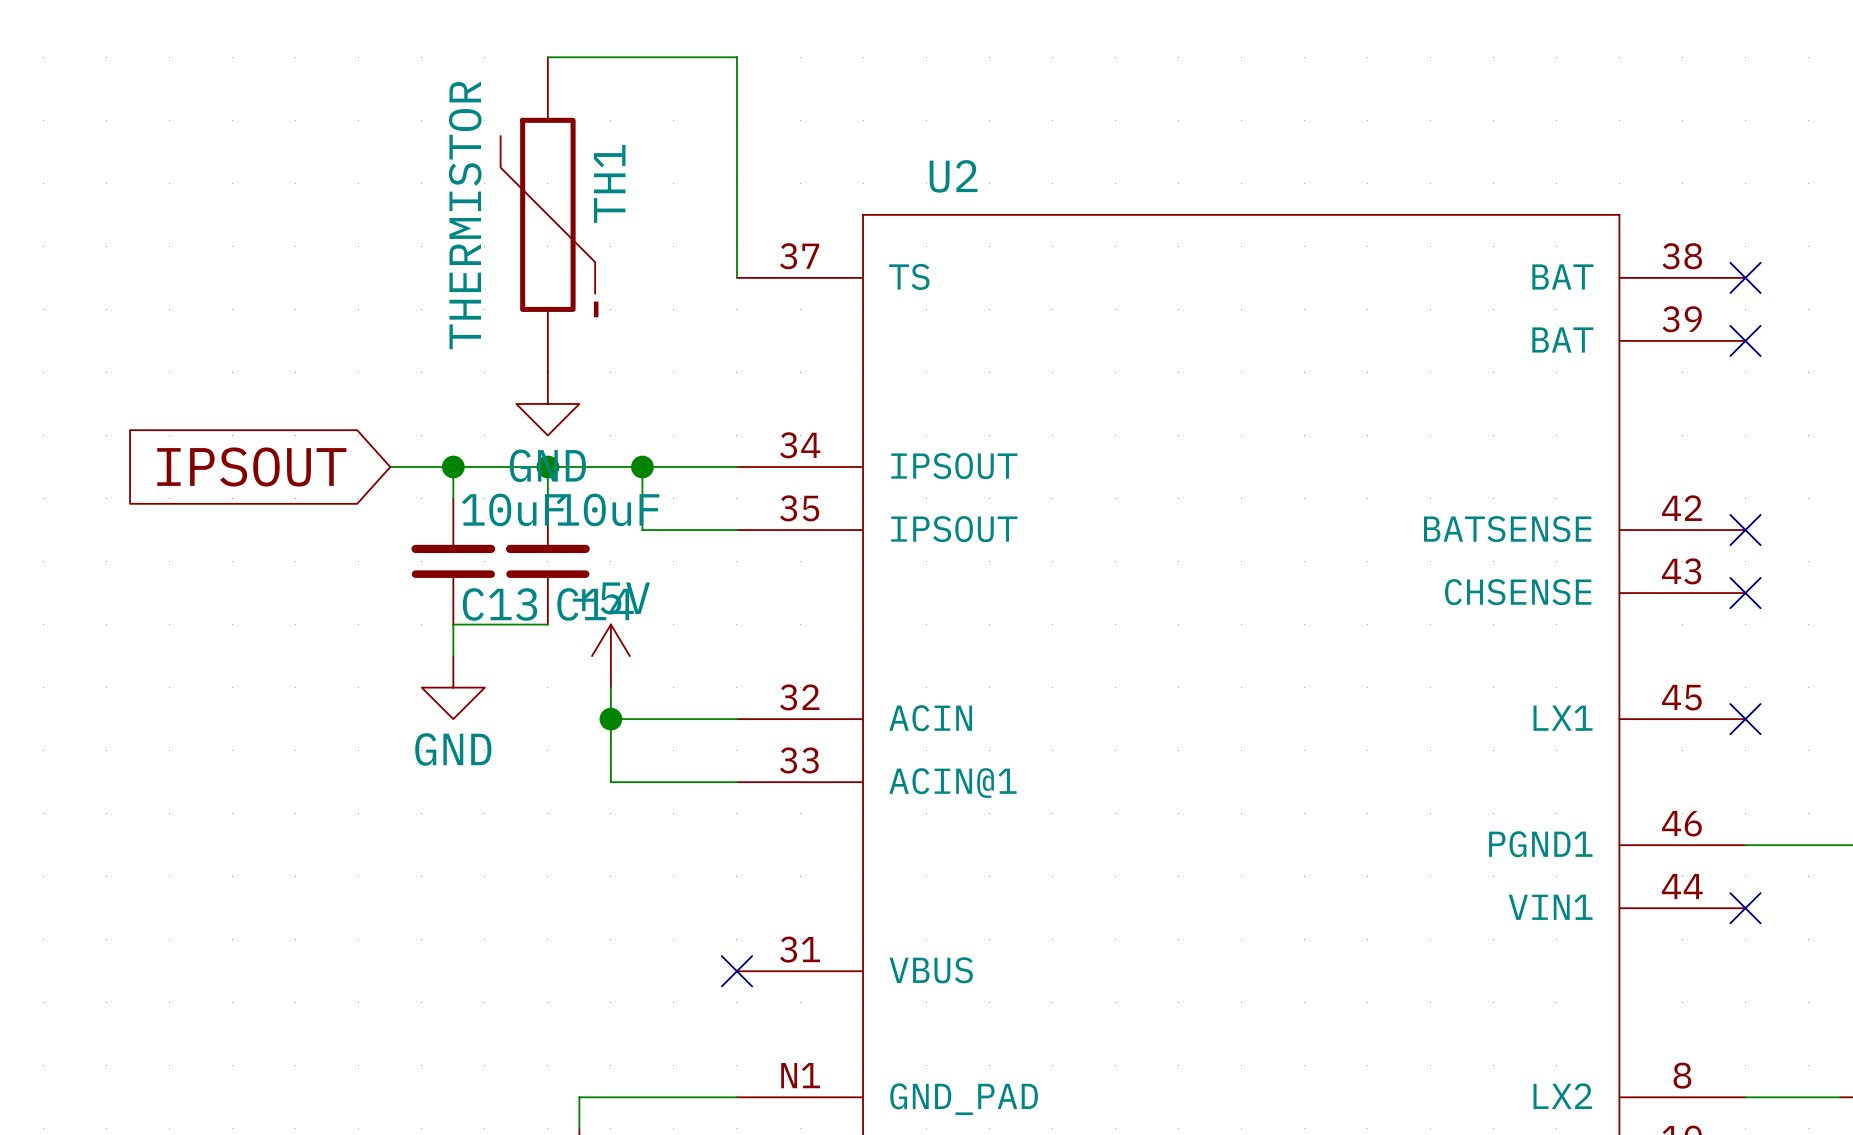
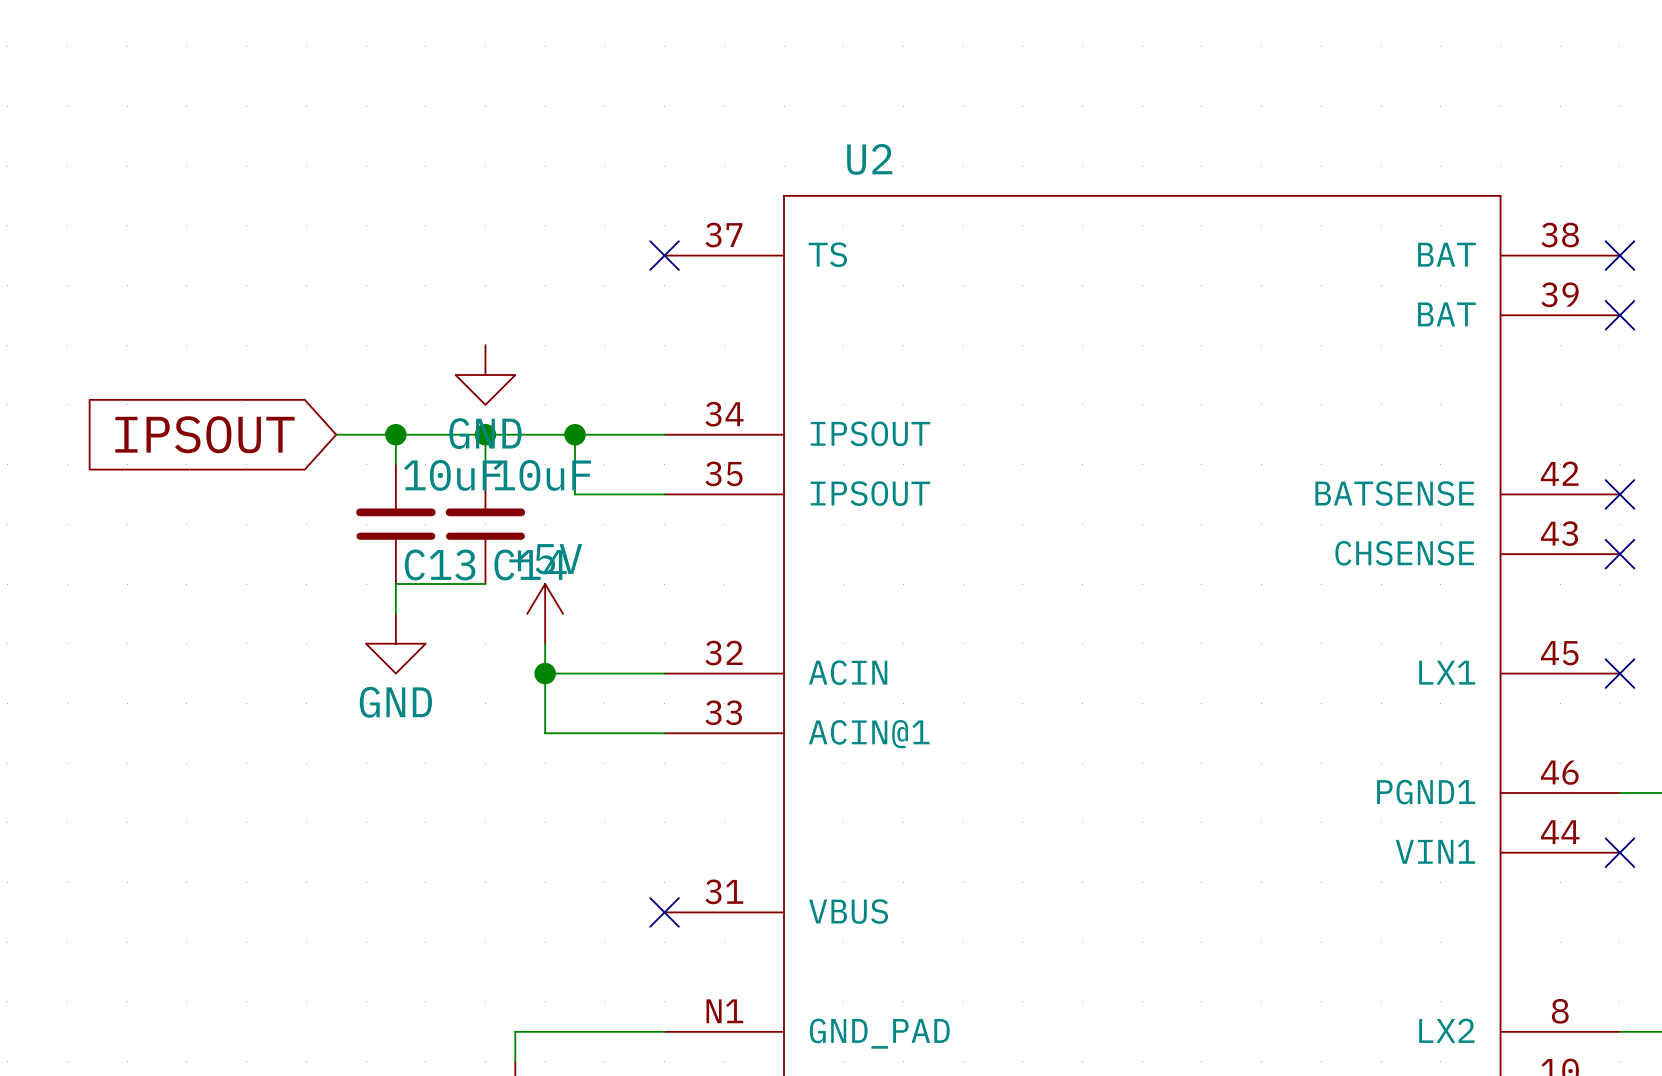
wire: (547, 57) (736, 57) (736, 277) -> none
TH1: THERMISTOR (547, 214) -> none
no-connect mark: none -> (664, 255)

